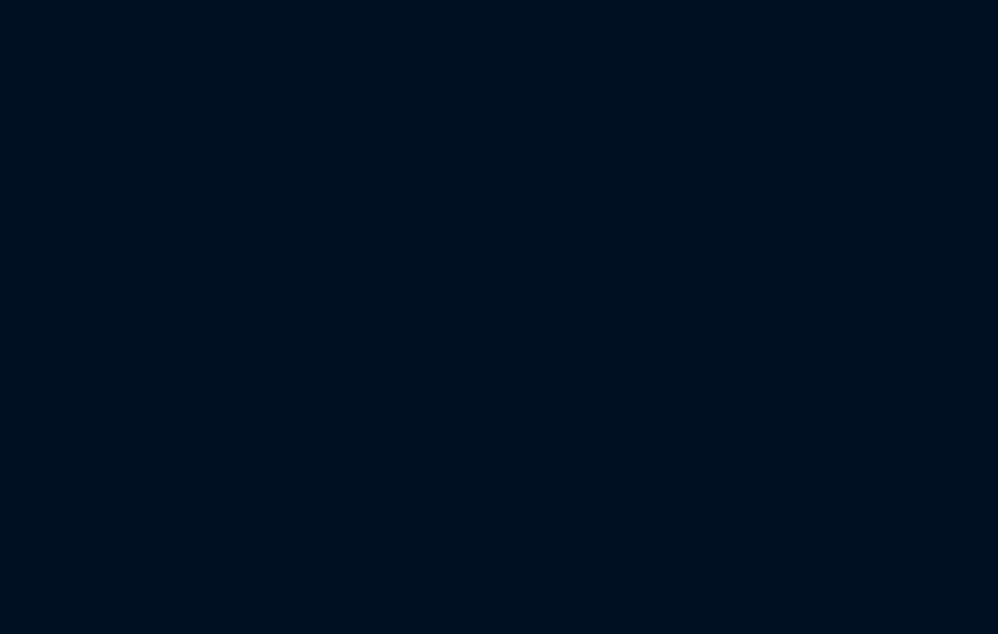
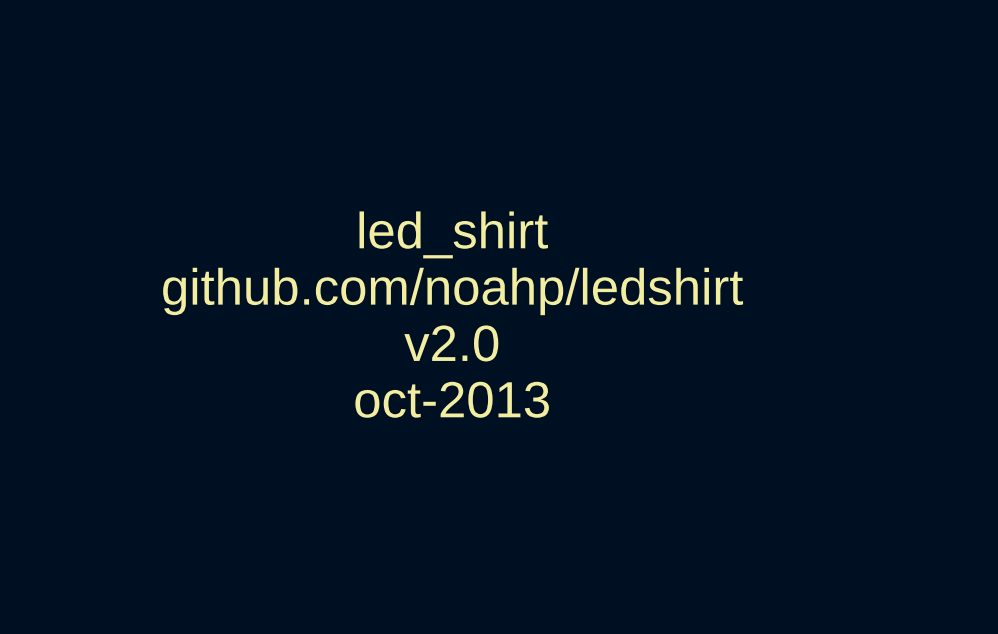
text: none -> led_shirt (453, 234)
text: none -> github.com/noahp/ledshirt (453, 291)
text: none -> v2.0 (451, 343)
text: none -> oct-2013 (452, 399)

